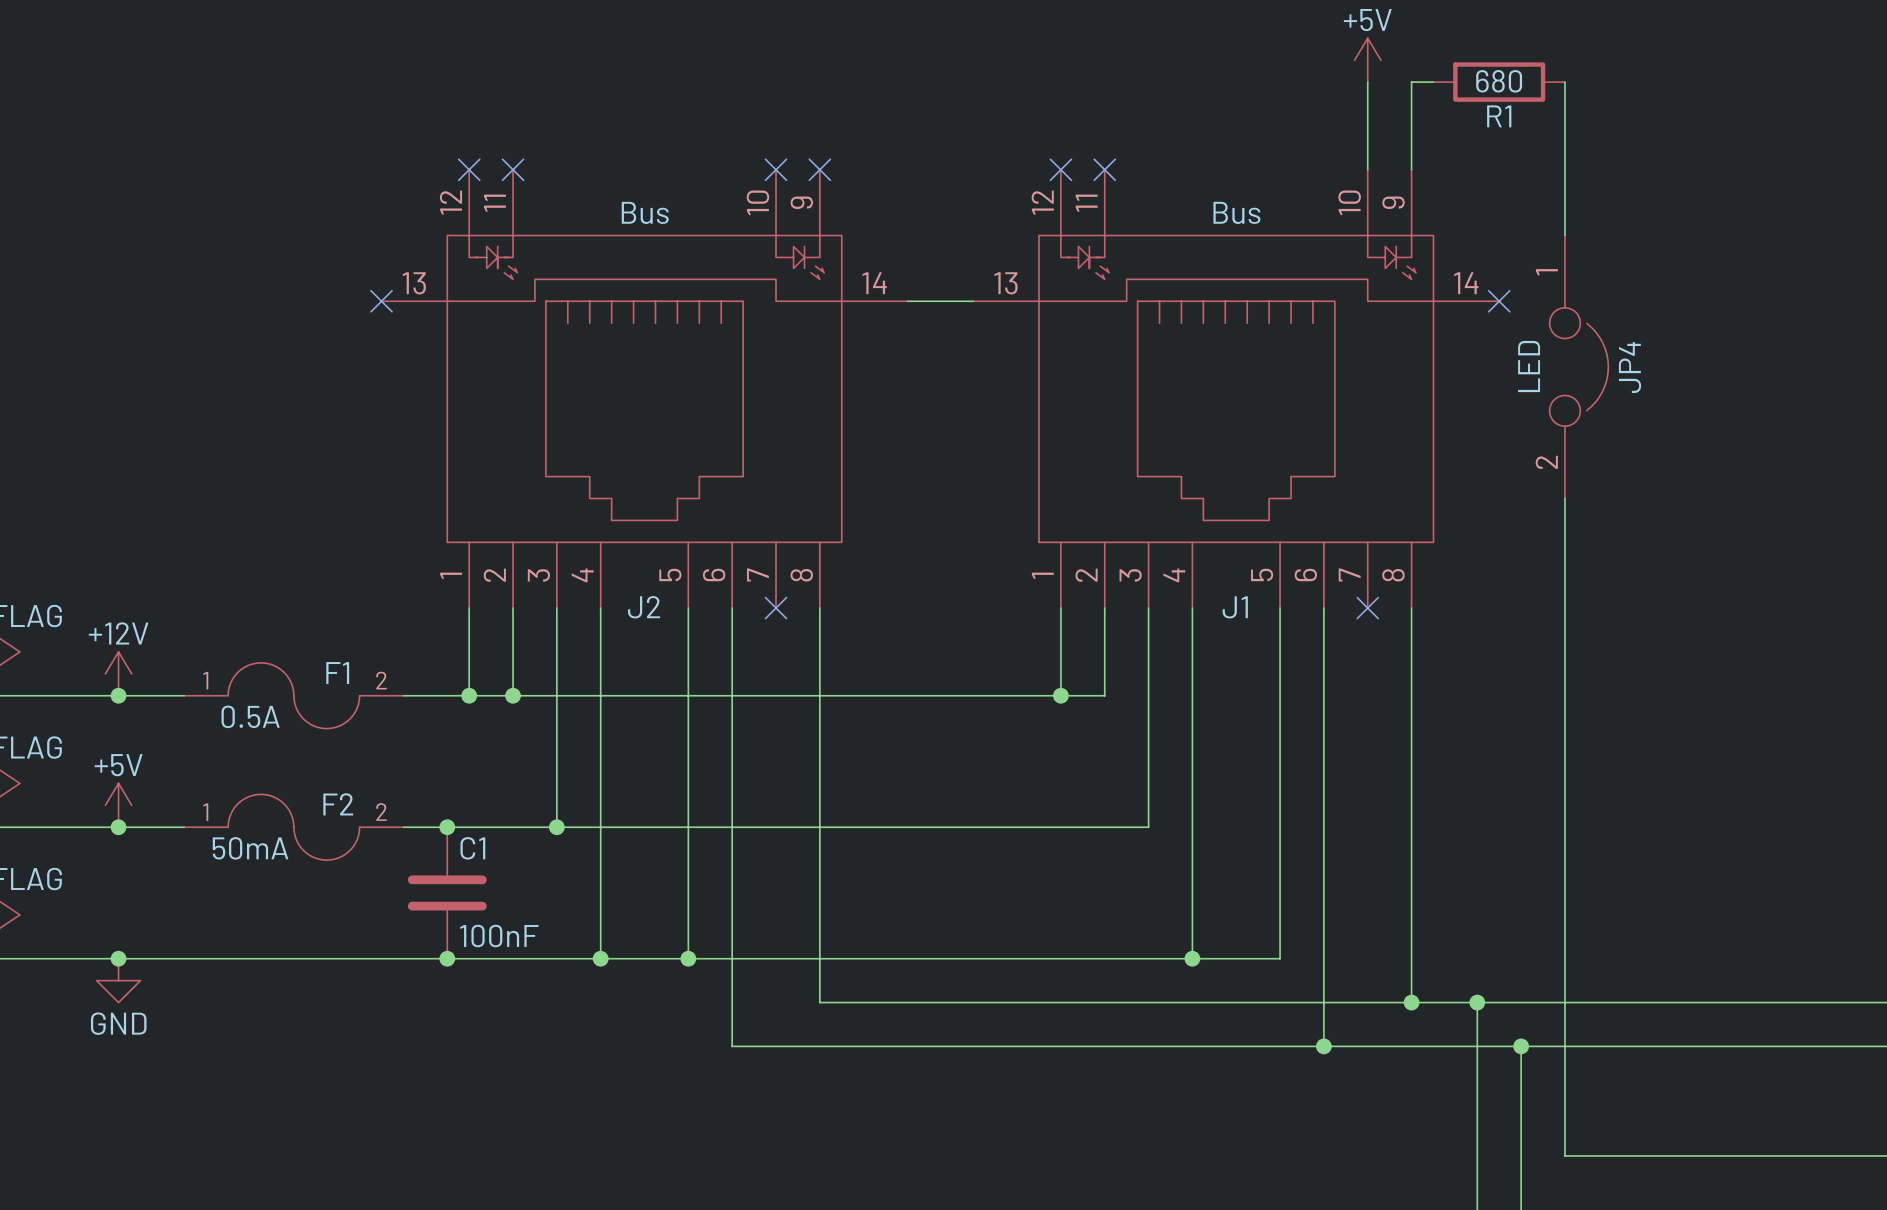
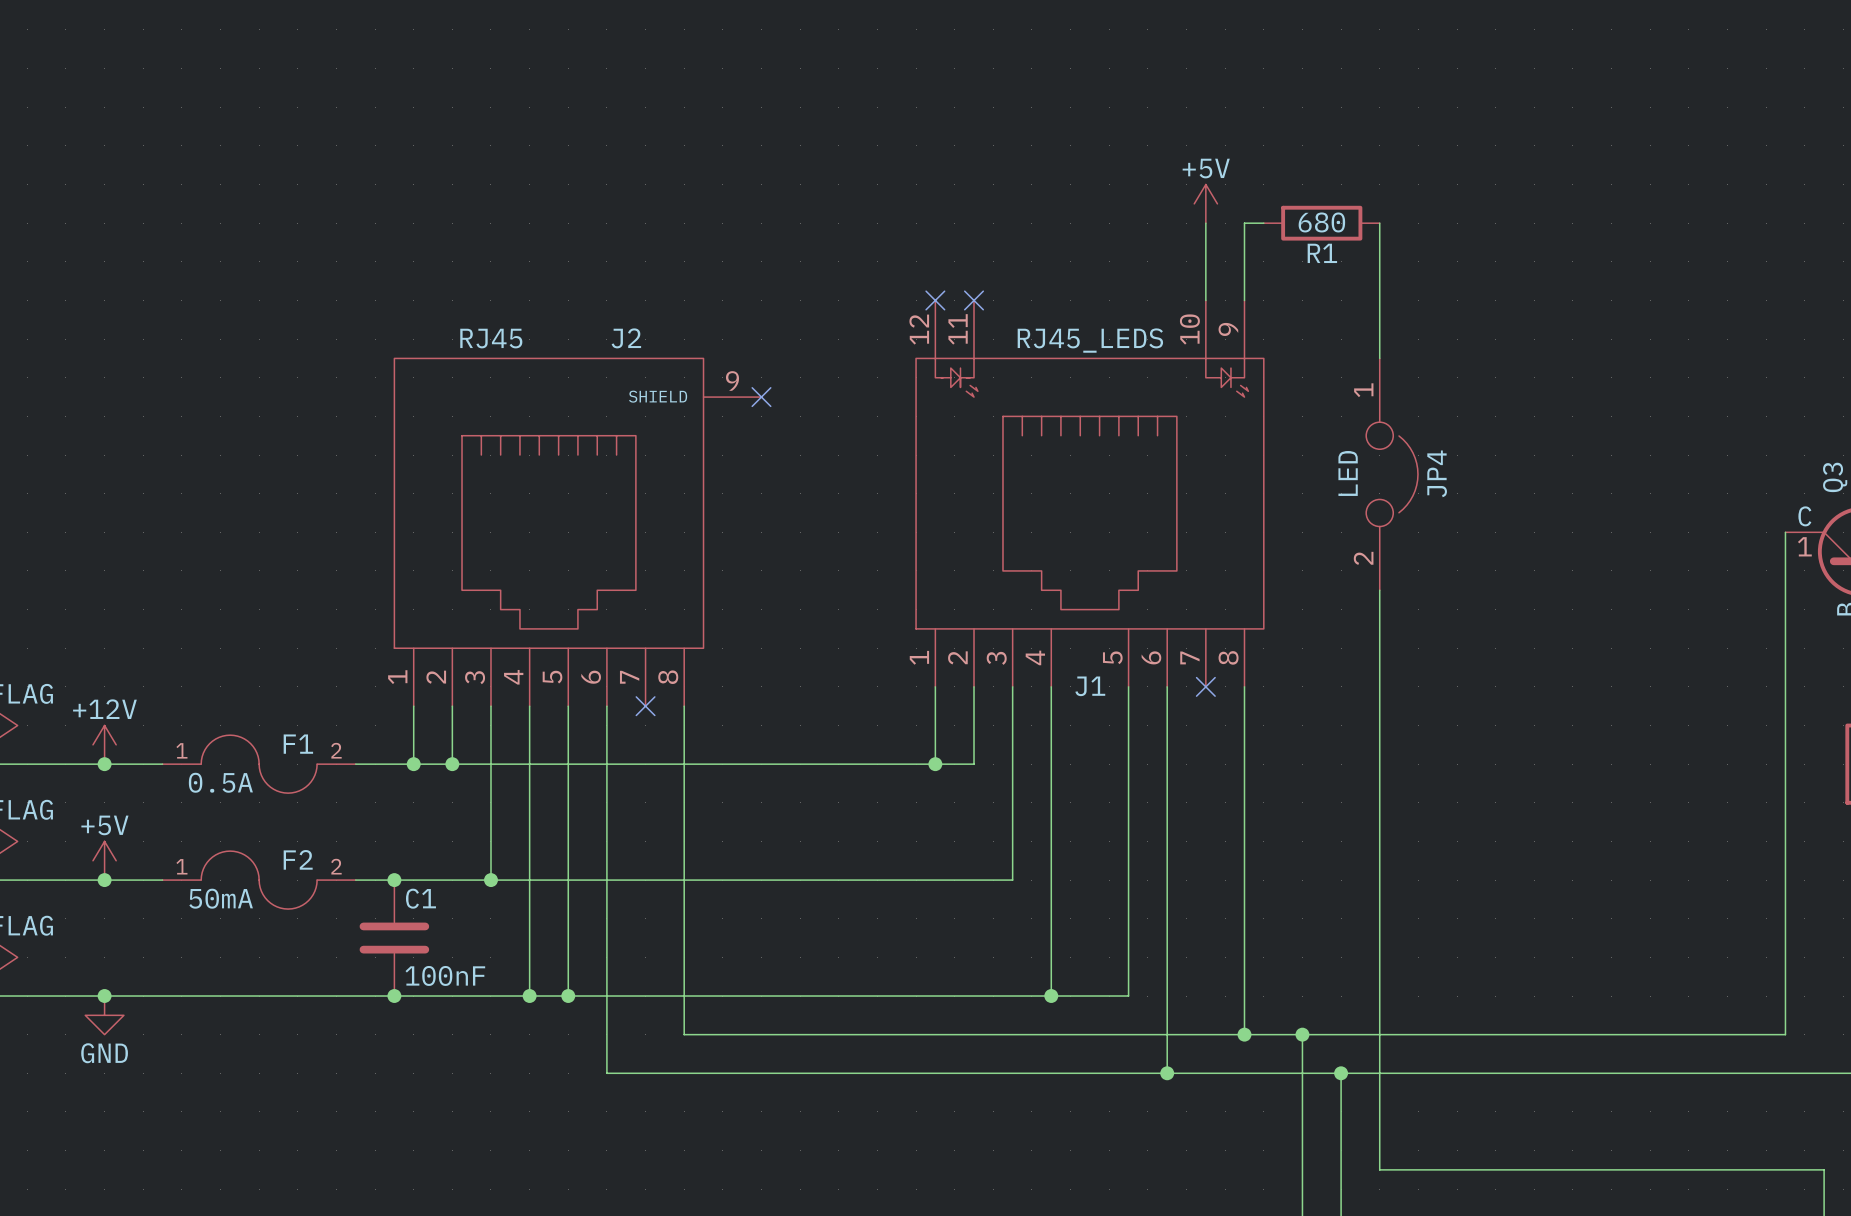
J2 symbol: [381, 169, 908, 609] -> [394, 358, 762, 707]
no-connect mark: (469, 169) -> none
no-connect mark: (513, 169) -> none
no-connect mark: (776, 169) -> none
no-connect mark: (819, 169) -> none
J1 symbol: [973, 169, 1500, 609] -> [916, 300, 1264, 687]
J2 value: Bus (645, 212) -> RJ45 (491, 338)
J1 value: Bus (1236, 212) -> RJ45_LEDS (1090, 340)
no-connect mark: none -> (761, 397)
no-connect mark: (381, 301) -> none
wire: (907, 301) (973, 301) -> none
no-connect mark: (1499, 301) -> none
J2 name position: J2 (644, 607) -> J2 (626, 338)
wire: (732, 608) (732, 1046) -> (606, 996) (606, 1073) (645, 1073)
no-connect mark position: (776, 608) -> (645, 706)
wire: (819, 608) (819, 1002) -> (684, 706) (684, 1034) (722, 1034)
wire: none -> (568, 706) (568, 996)
junction position: (688, 958) -> (568, 996)

